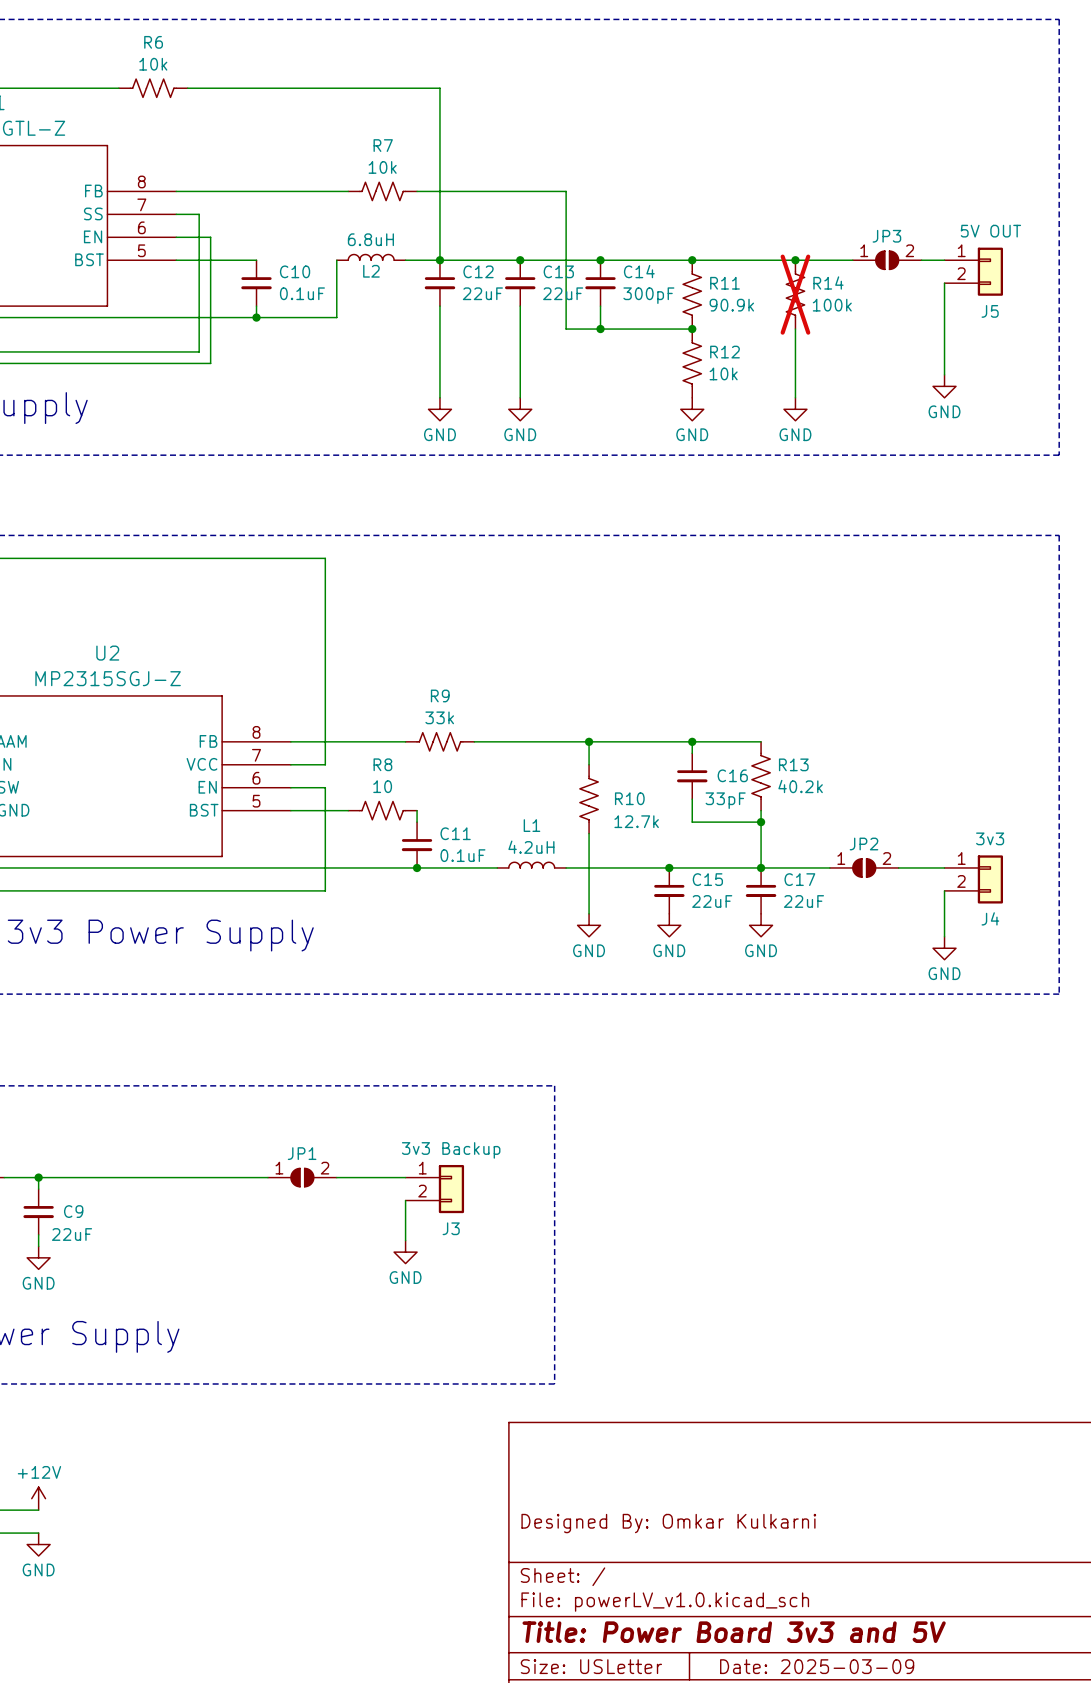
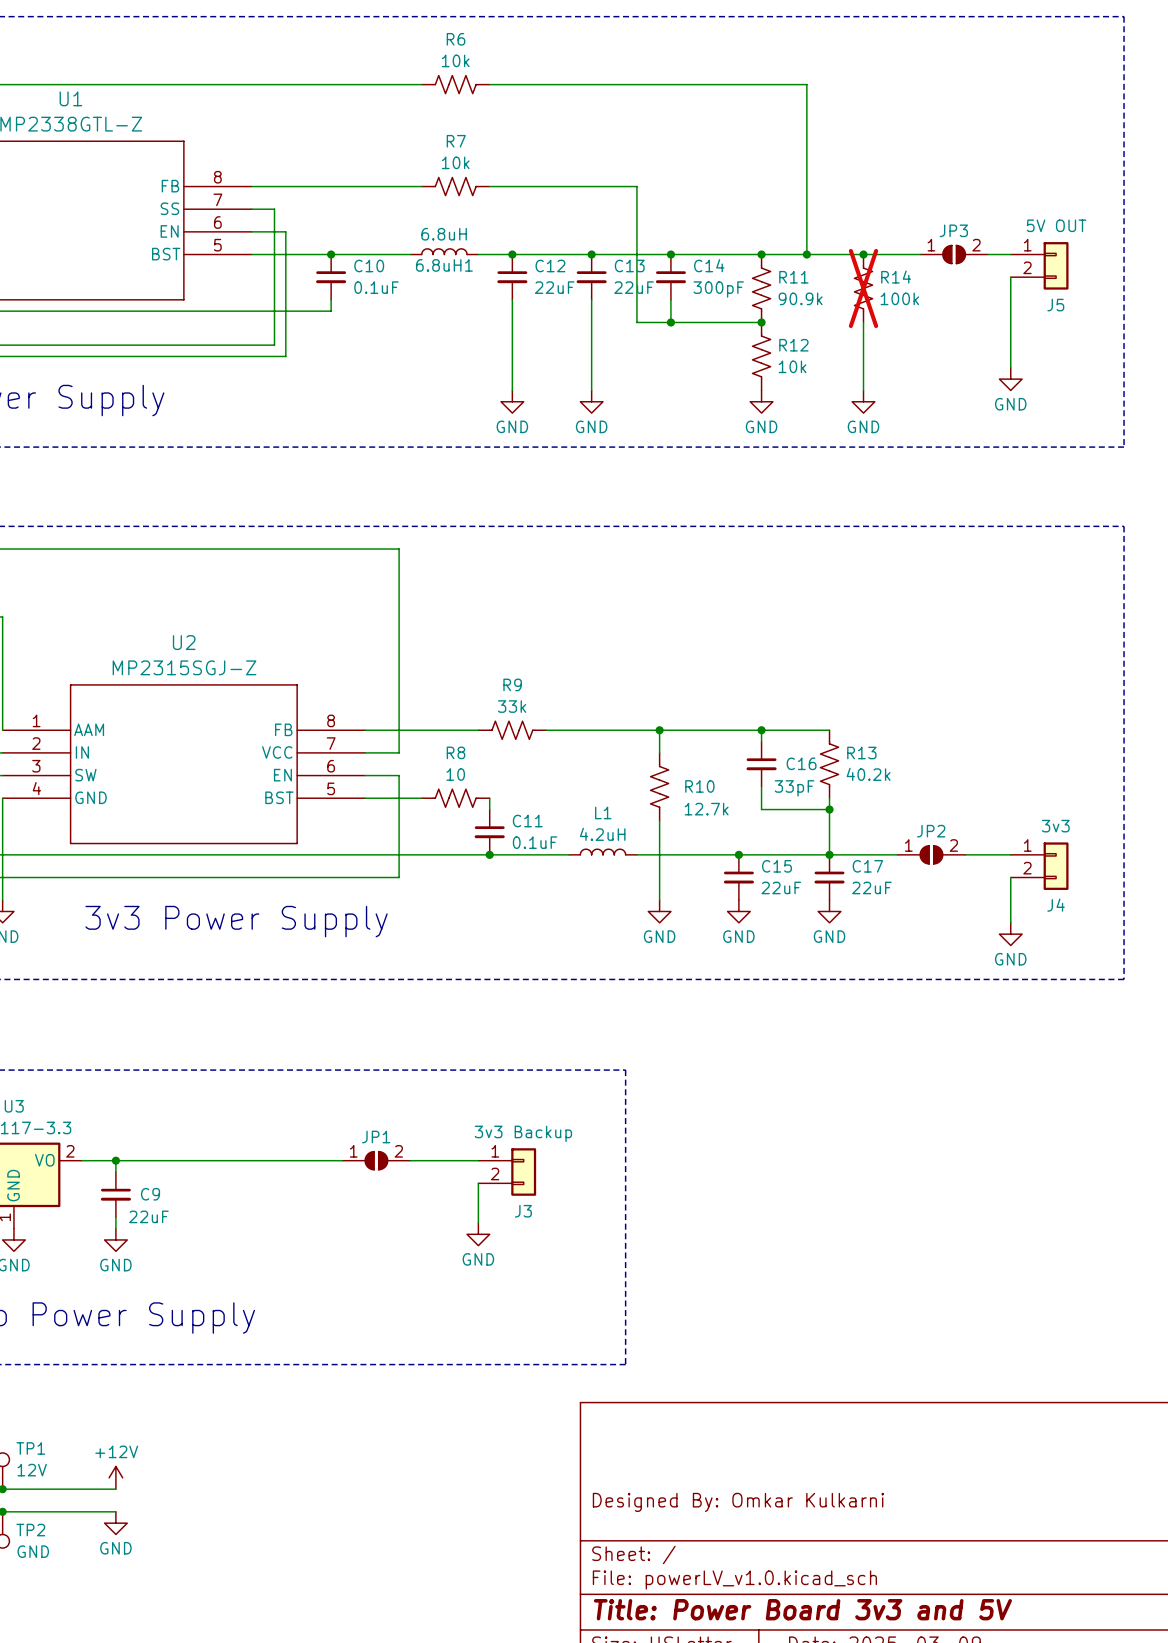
R6 position: (153, 88) -> (455, 84)
wire: (439, 88) (439, 260) -> (512, 84) (806, 84) (806, 254)
junction: none -> (331, 254)
wire: (336, 260) (336, 317) (256, 317) -> (410, 254) (331, 254)
junction: none -> (806, 254)
L2 name: L2 (371, 271) -> 6.8uH1 (444, 265)
junction: (256, 317) -> none

